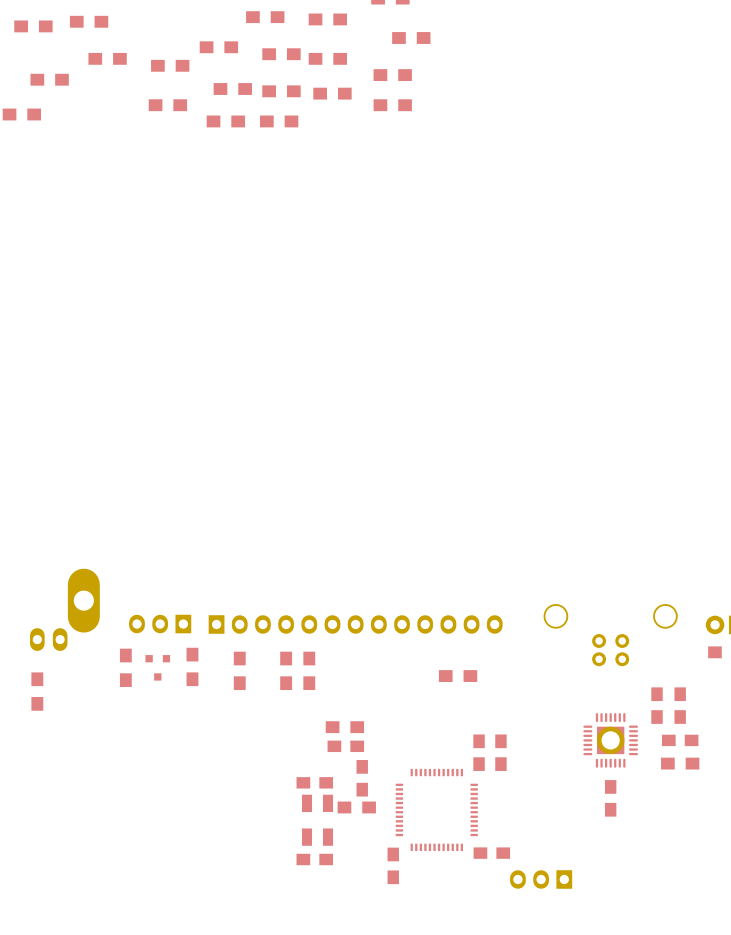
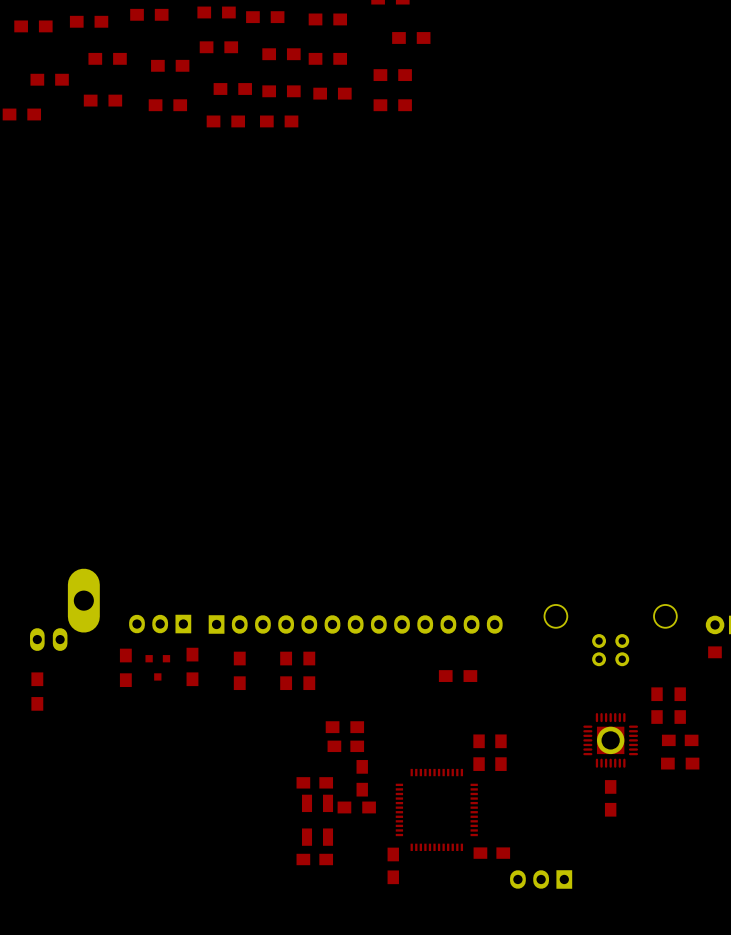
part: none -> (216, 12)
part: none -> (149, 14)
part: none -> (102, 100)

